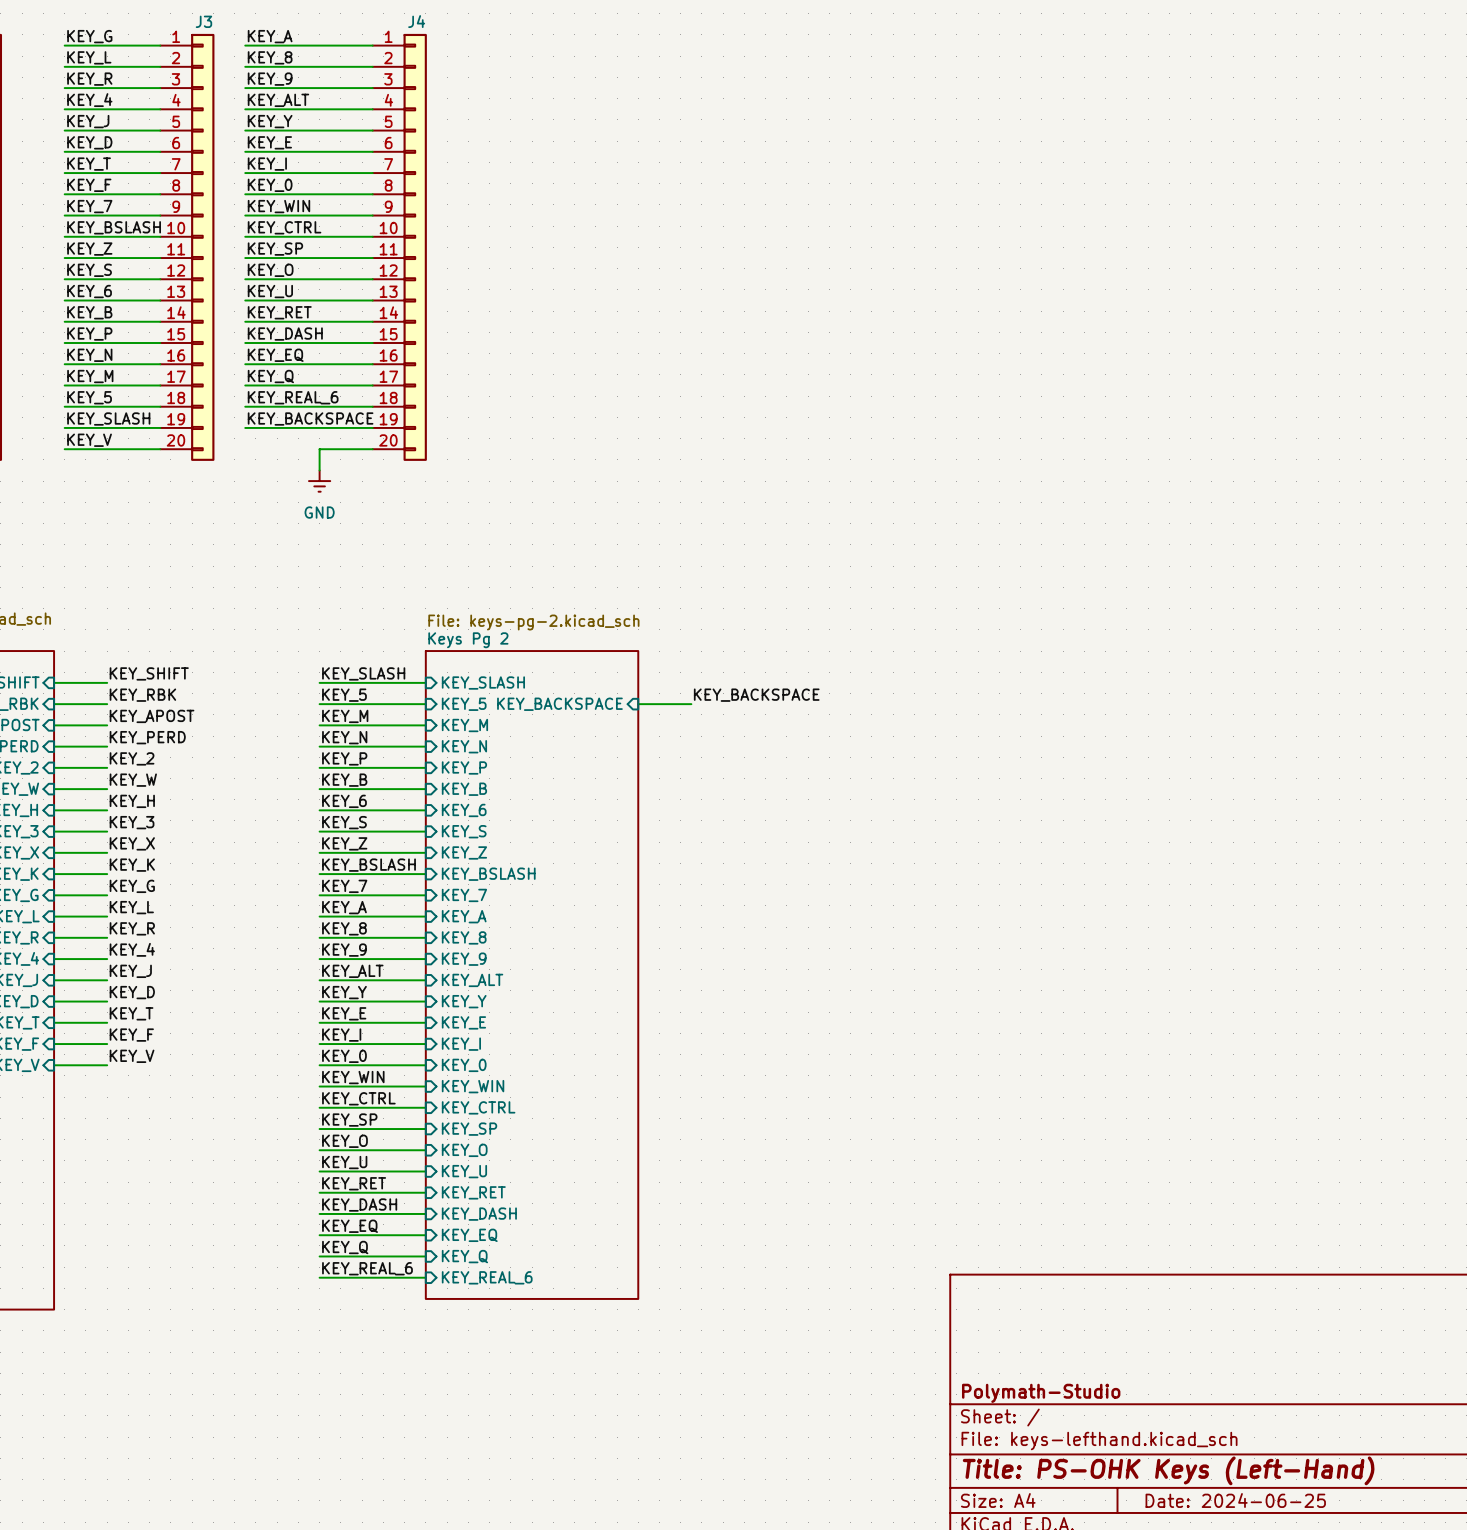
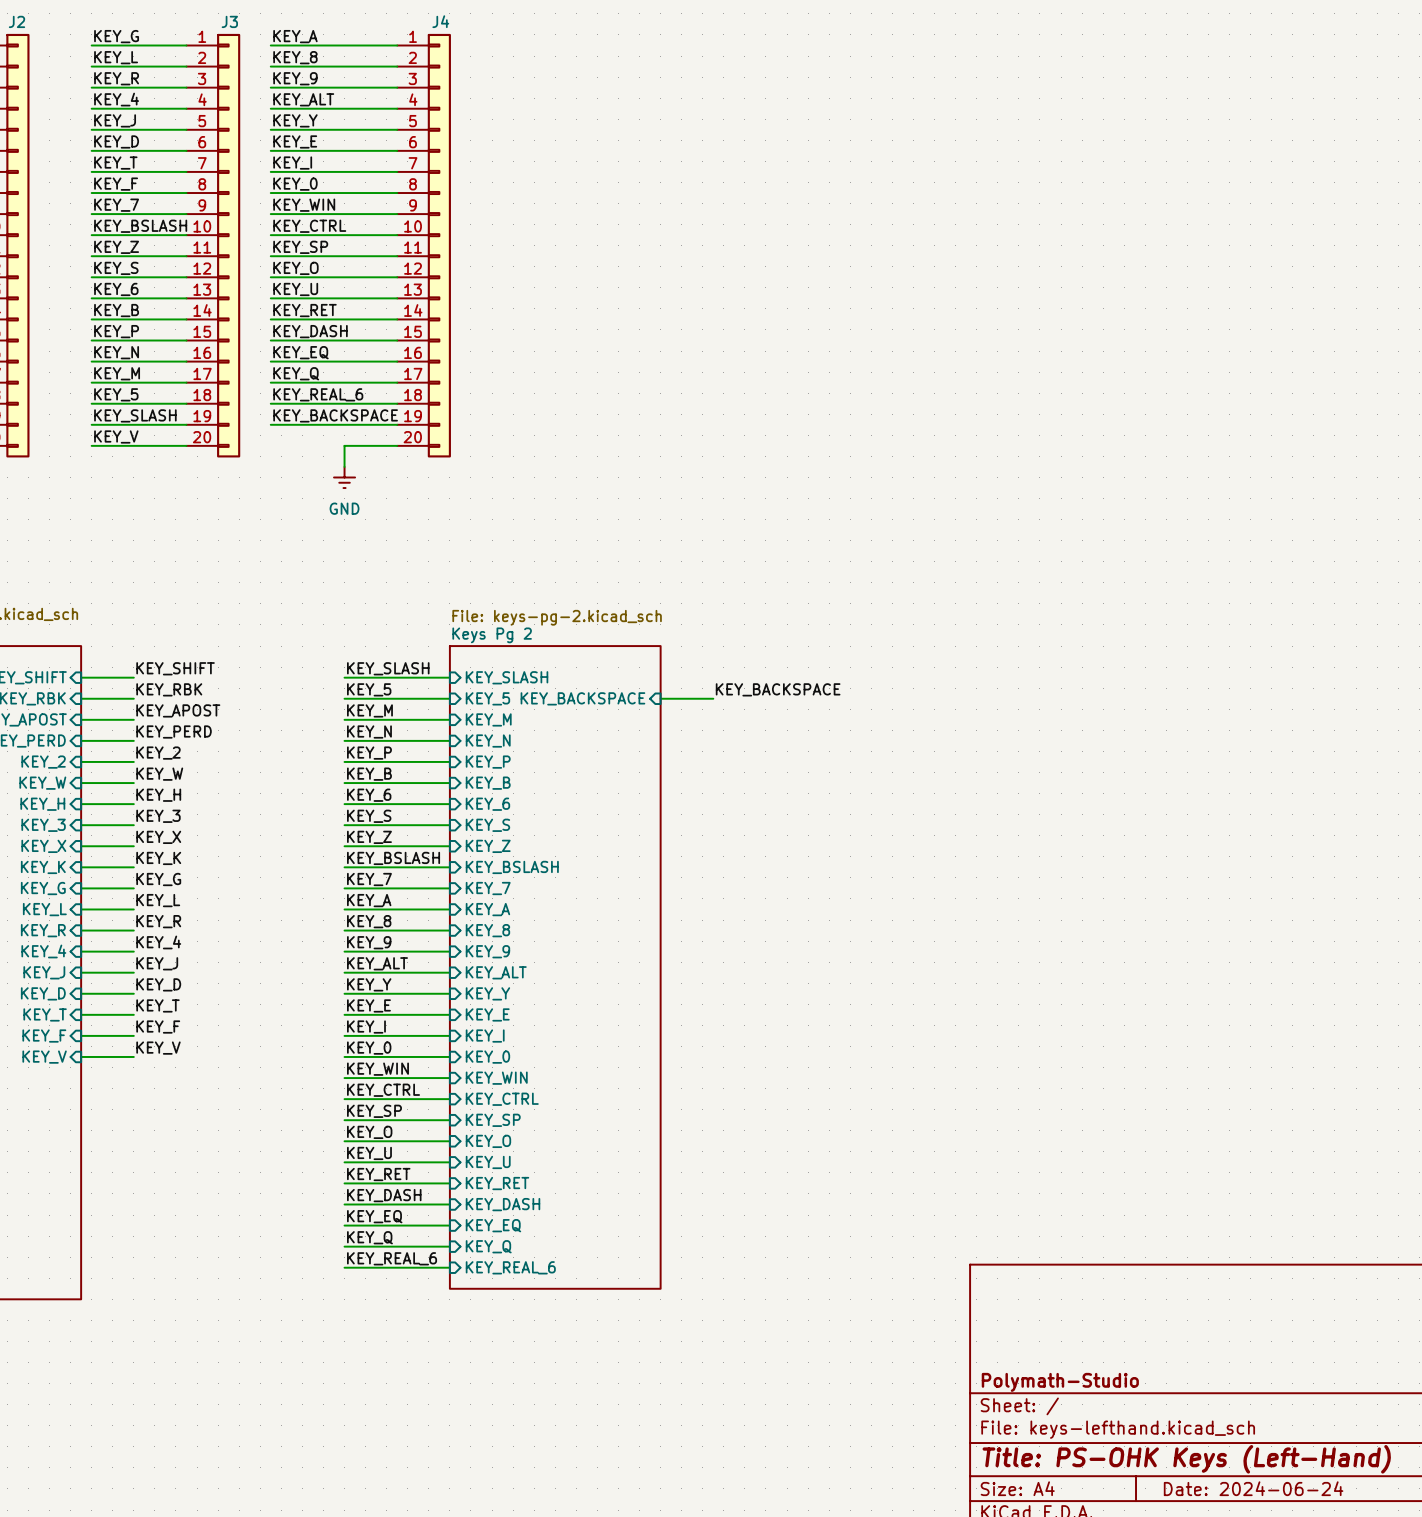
title block: Date: 2024-06-25 (1235, 1500) -> Date: 2024-06-24 (1253, 1488)

